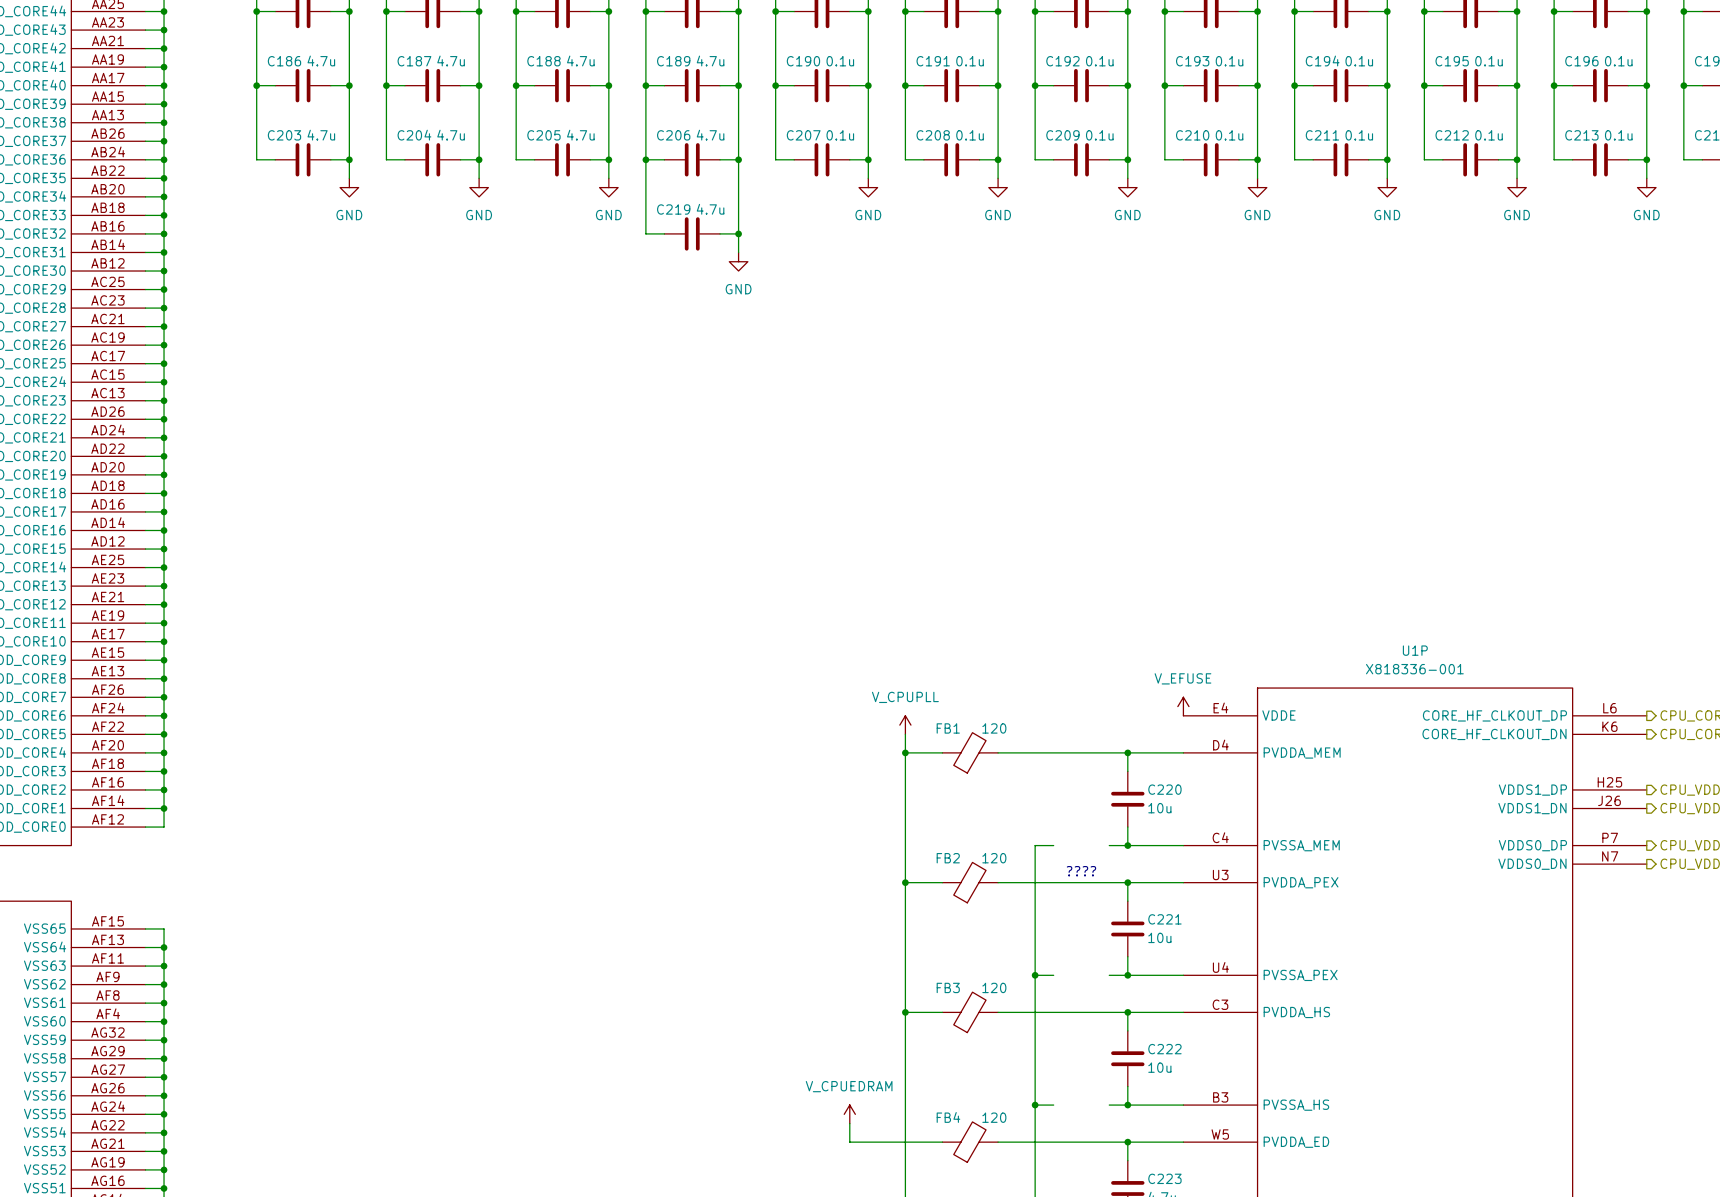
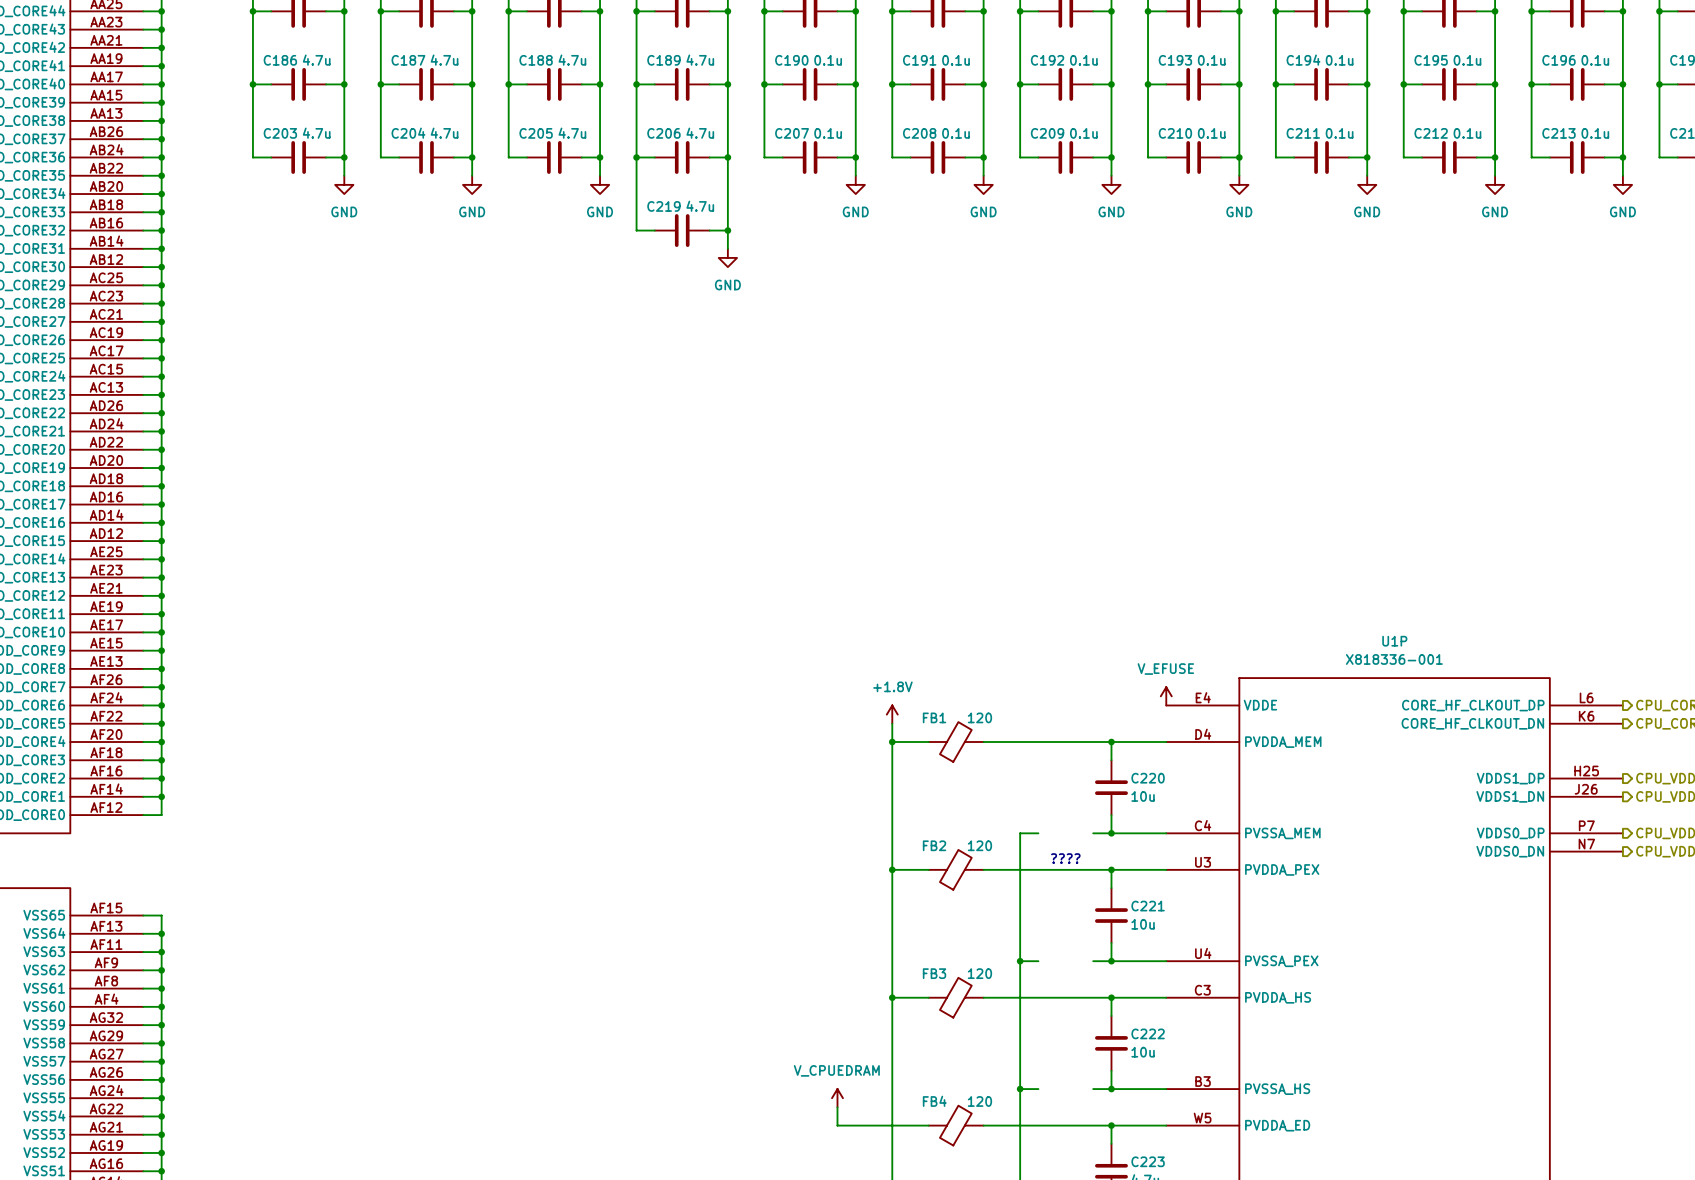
power symbol: V_CPUPLL (905, 725) -> +1.8V (892, 714)

